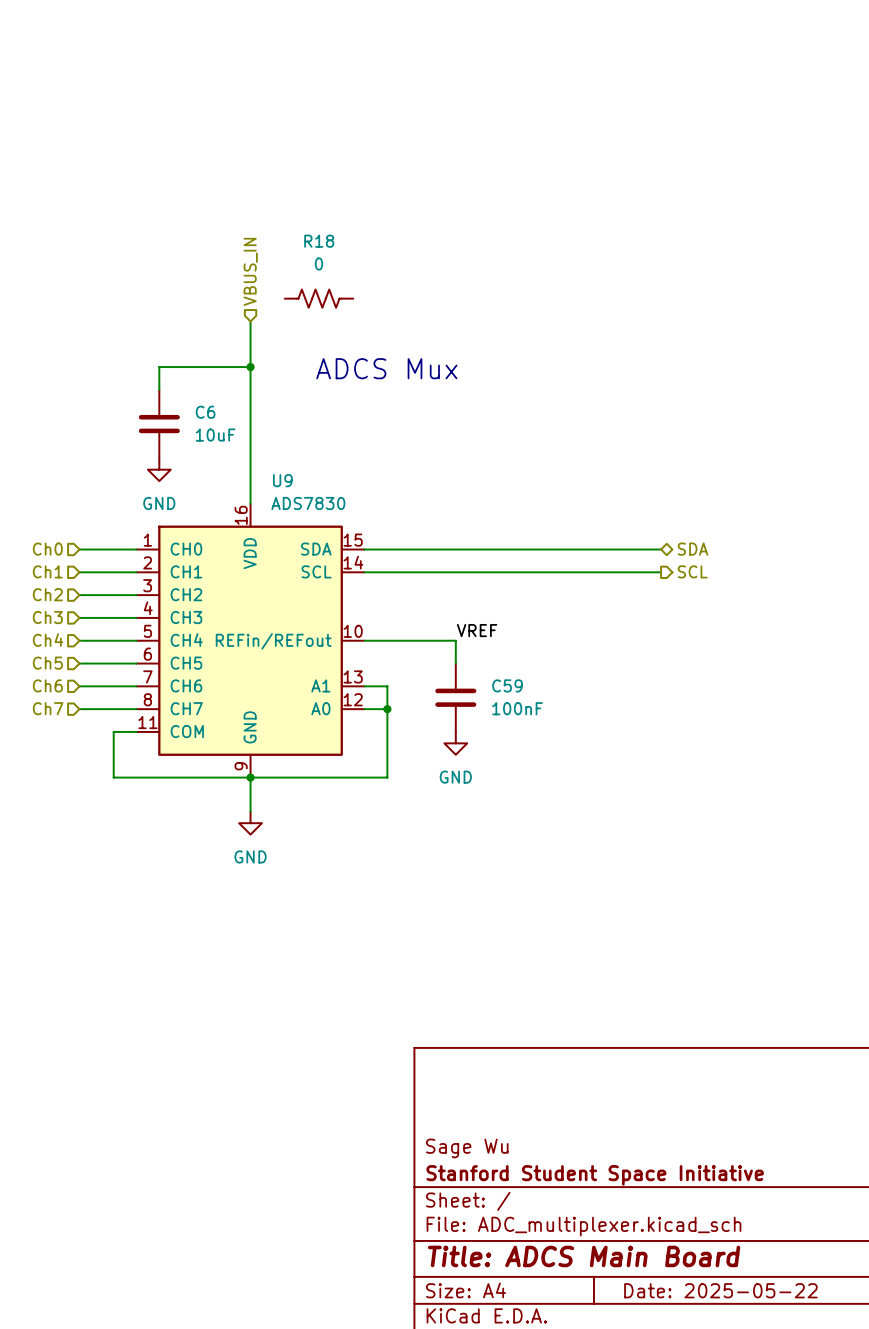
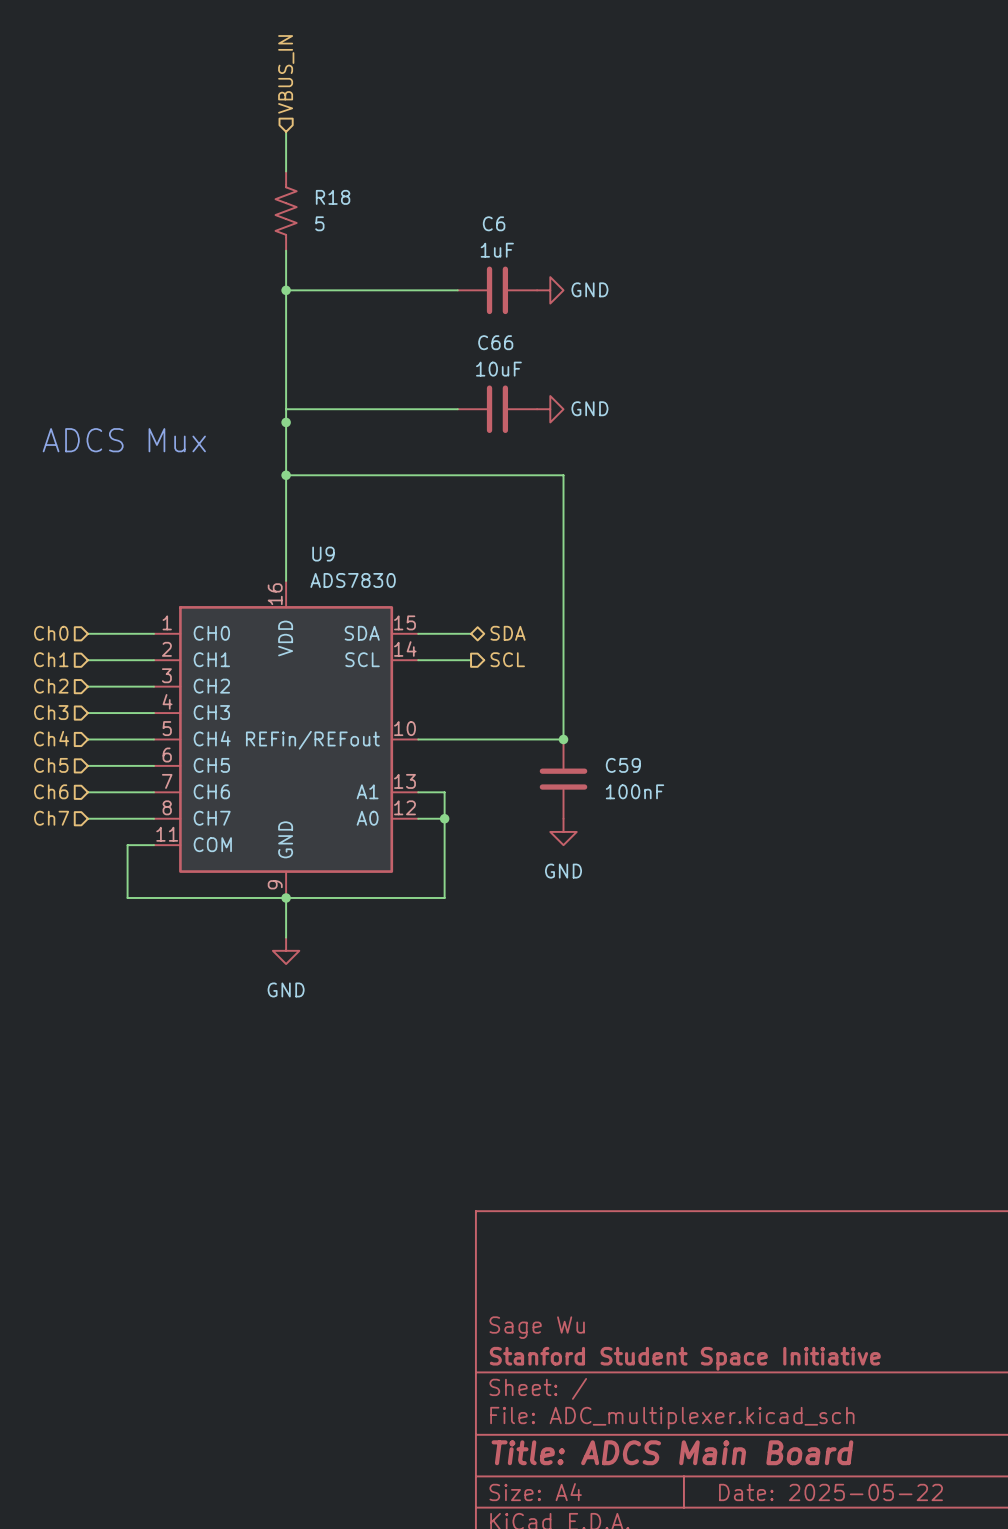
wire: none -> (286, 131) (286, 171)
wire: none -> (286, 250) (286, 369)
R18 name position: R18 (319, 241) -> R18 (333, 197)
wire: none -> (286, 290) (457, 290)
junction: none -> (286, 290)
power symbol: none -> GND (550, 290)
R18 value: 0 (318, 264) -> 5 (319, 223)
hierarchical label position: VBUS_IN (250, 271) -> VBUS_IN (286, 74)
R18 rotation: 0° (318, 298) -> 90° clockwise (286, 211)
R18 position: (318, 298) -> (286, 211)
wire: none -> (286, 409) (457, 409)
C66: none -> 10uF (497, 409)
power symbol: none -> GND (550, 409)
wire: (250, 367) (159, 367) (159, 389) -> none
text: ADCS Mux (386, 368) -> none
text: none -> ADCS Mux (124, 440)
C6 name position: C6 (205, 412) -> C6 (494, 223)
junction: none -> (286, 475)
C6 rotation: 0° (159, 424) -> 90° clockwise (497, 290)
C6 position: (159, 424) -> (497, 290)
C6 value: 10uF (215, 435) -> 1uF (497, 250)
power symbol: GND (159, 469) -> none
wire: (410, 549) (661, 549) -> none
hierarchical label: none -> SDA (508, 633)
hierarchical label: SDA (693, 549) -> none
hierarchical label: none -> SCL (507, 659)
hierarchical label: SCL (692, 571) -> none
wire: (410, 572) (661, 572) -> none
label: VREF (477, 630) -> none
wire: (455, 640) (455, 663) -> (523, 739) (563, 739) (563, 475) (286, 475)
junction: none -> (563, 739)
C59 position: (455, 697) -> (563, 779)
power symbol position: GND (455, 743) -> GND (563, 831)

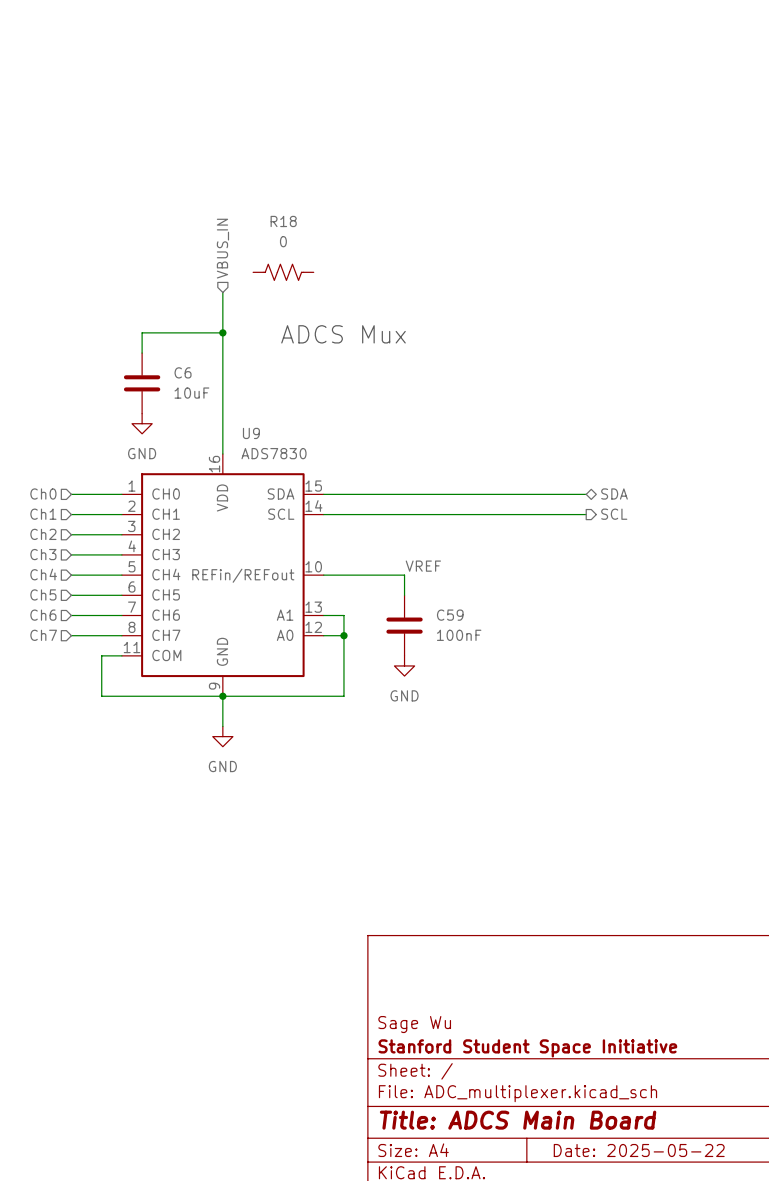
hierarchical label position: VBUS_IN (286, 74) -> VBUS_IN (222, 248)
wire: (286, 131) (286, 171) -> none
R18 name position: R18 (333, 197) -> R18 (283, 221)
R18 rotation: 0° (286, 211) -> 90° clockwise (283, 272)
R18 position: (286, 211) -> (283, 272)
R18 value: 5 (319, 223) -> 0 (283, 241)
wire: (286, 250) (286, 369) -> none
C6 value: 1uF (497, 250) -> 10uF (191, 393)
wire: (286, 290) (457, 290) -> none
junction: (286, 290) -> none
C6 rotation: 0° (497, 290) -> 90° clockwise (142, 383)
C6 position: (497, 290) -> (142, 383)
power symbol: GND (550, 290) -> none
wire: (286, 409) (457, 409) -> none
C66: 10uF (497, 409) -> none
power symbol: GND (550, 409) -> none
wire: none -> (222, 332) (142, 332) (142, 353)
text: none -> ADCS Mux (343, 334)
text: ADCS Mux (124, 440) -> none
wire: (286, 475) (563, 475) (563, 739) (523, 739) -> (404, 595) (404, 575)
junction: (286, 475) -> none
power symbol: none -> GND (142, 423)
wire: none -> (364, 494) (586, 494)
hierarchical label: SDA (508, 633) -> none
hierarchical label: none -> SDA (614, 494)
hierarchical label: SCL (507, 659) -> none
hierarchical label: none -> SCL (614, 514)
wire: none -> (364, 514) (586, 514)
label: none -> VREF (423, 566)
junction: (563, 739) -> none
C59 position: (563, 779) -> (404, 625)
power symbol position: GND (563, 831) -> GND (404, 665)

